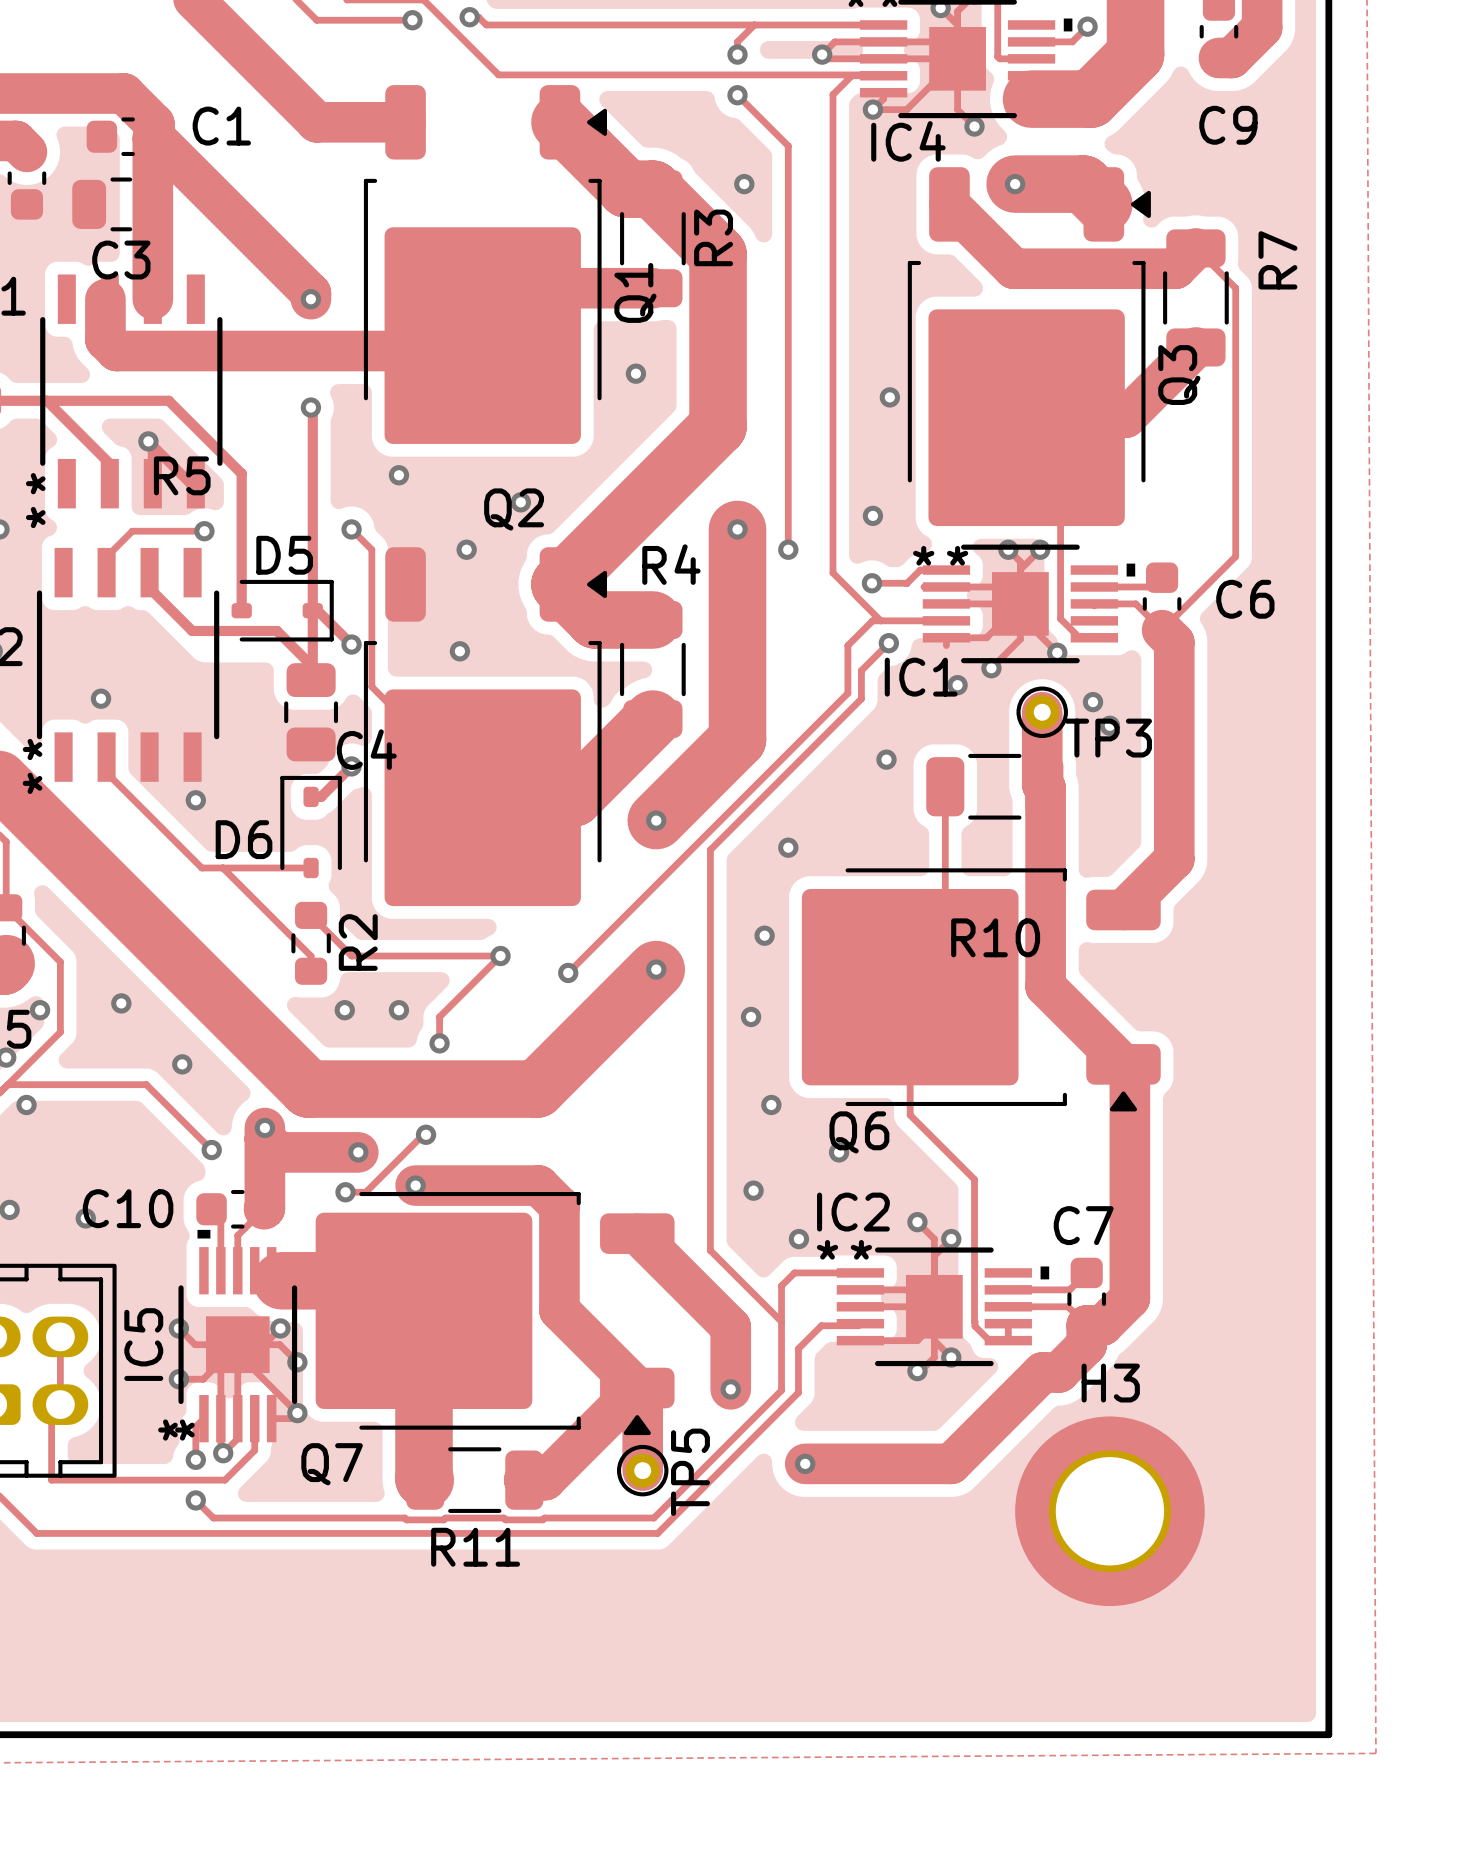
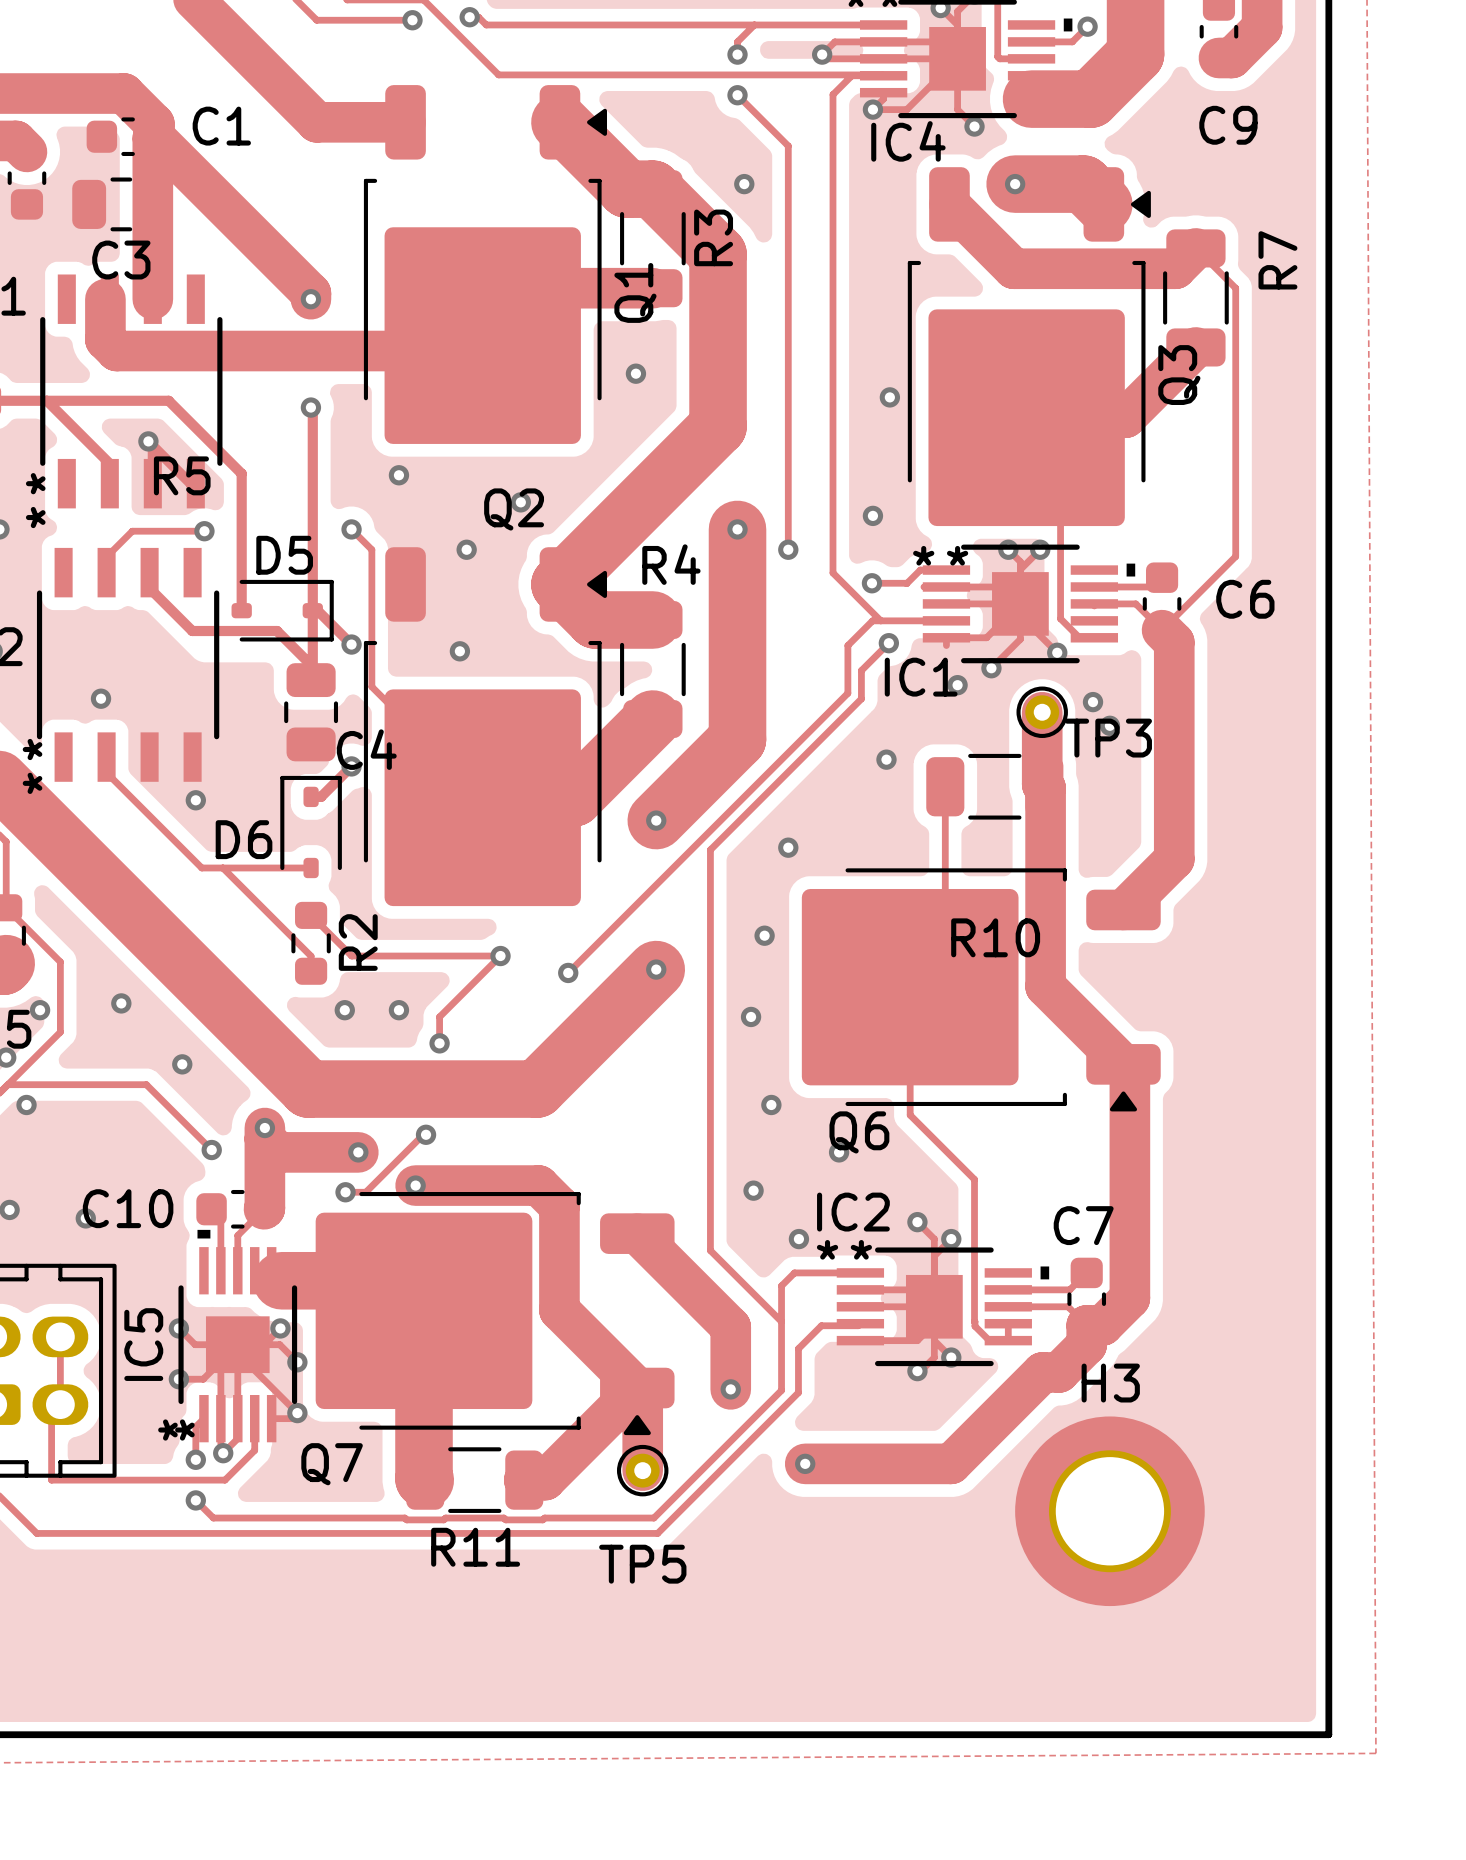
TP5 name rotation: 0° (690, 1472) -> 90° clockwise (642, 1564)

